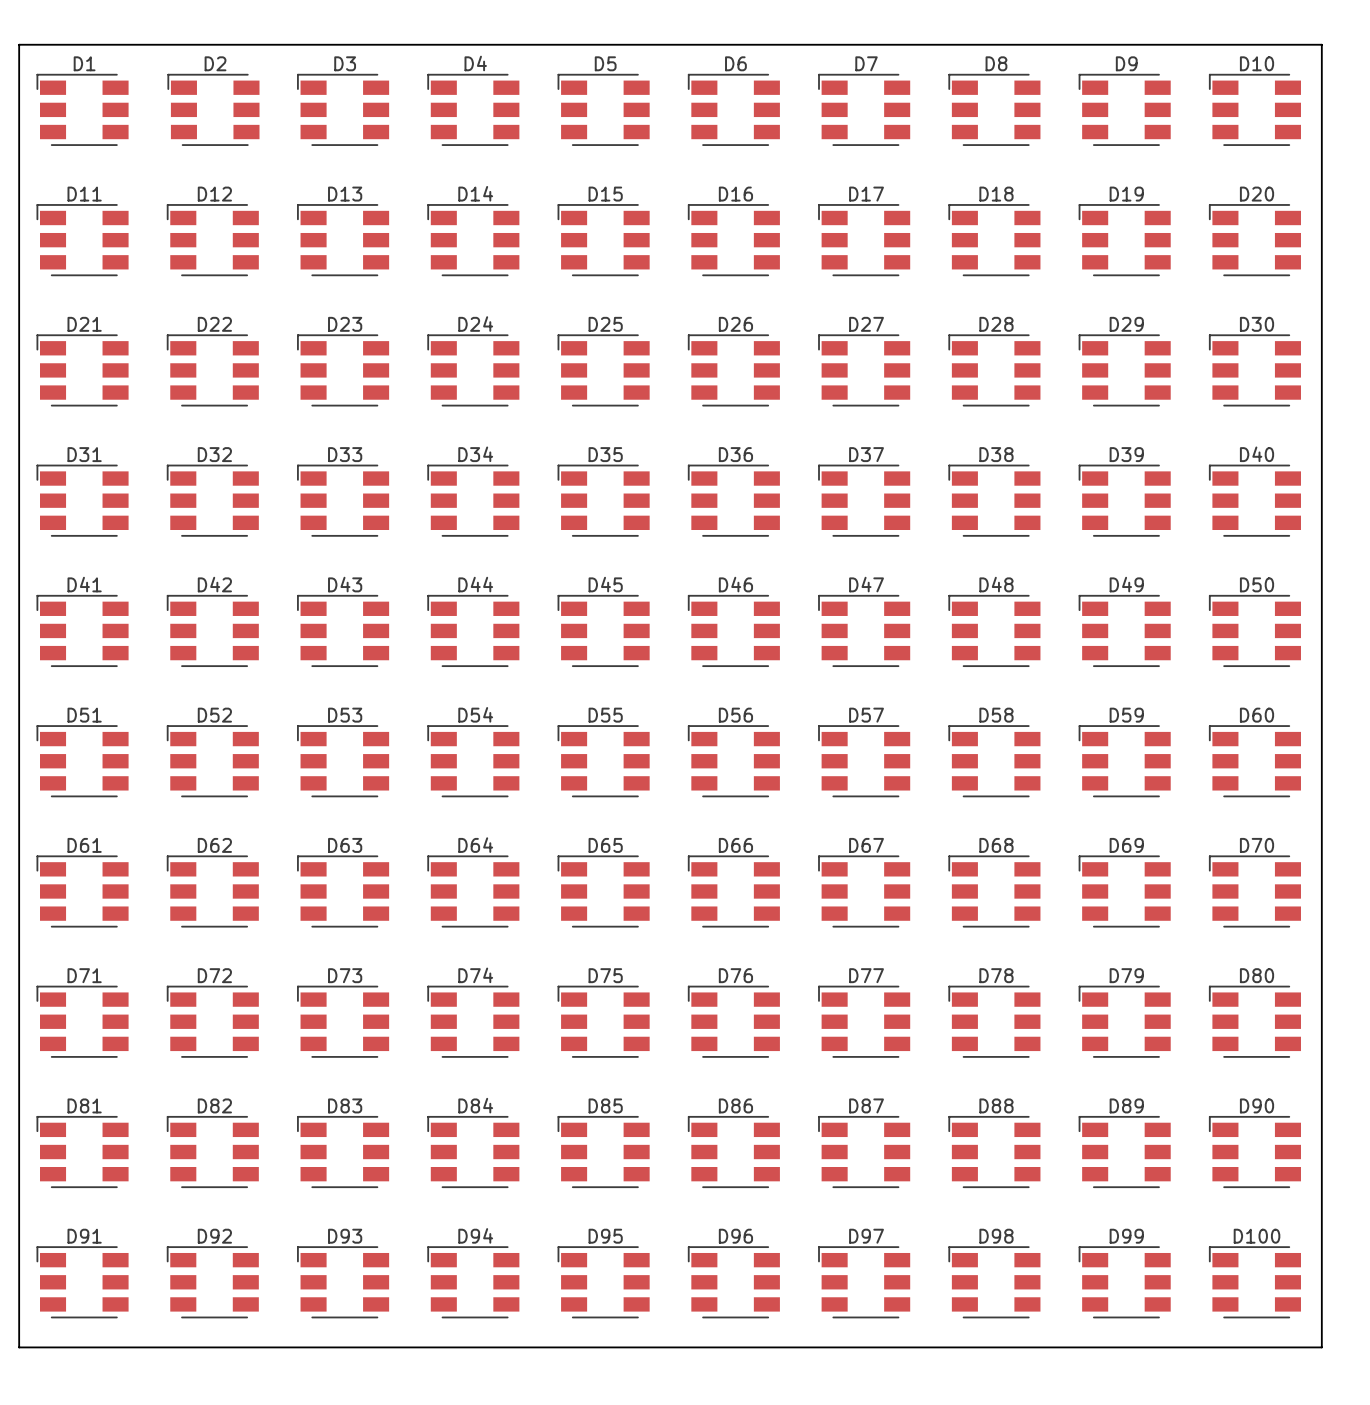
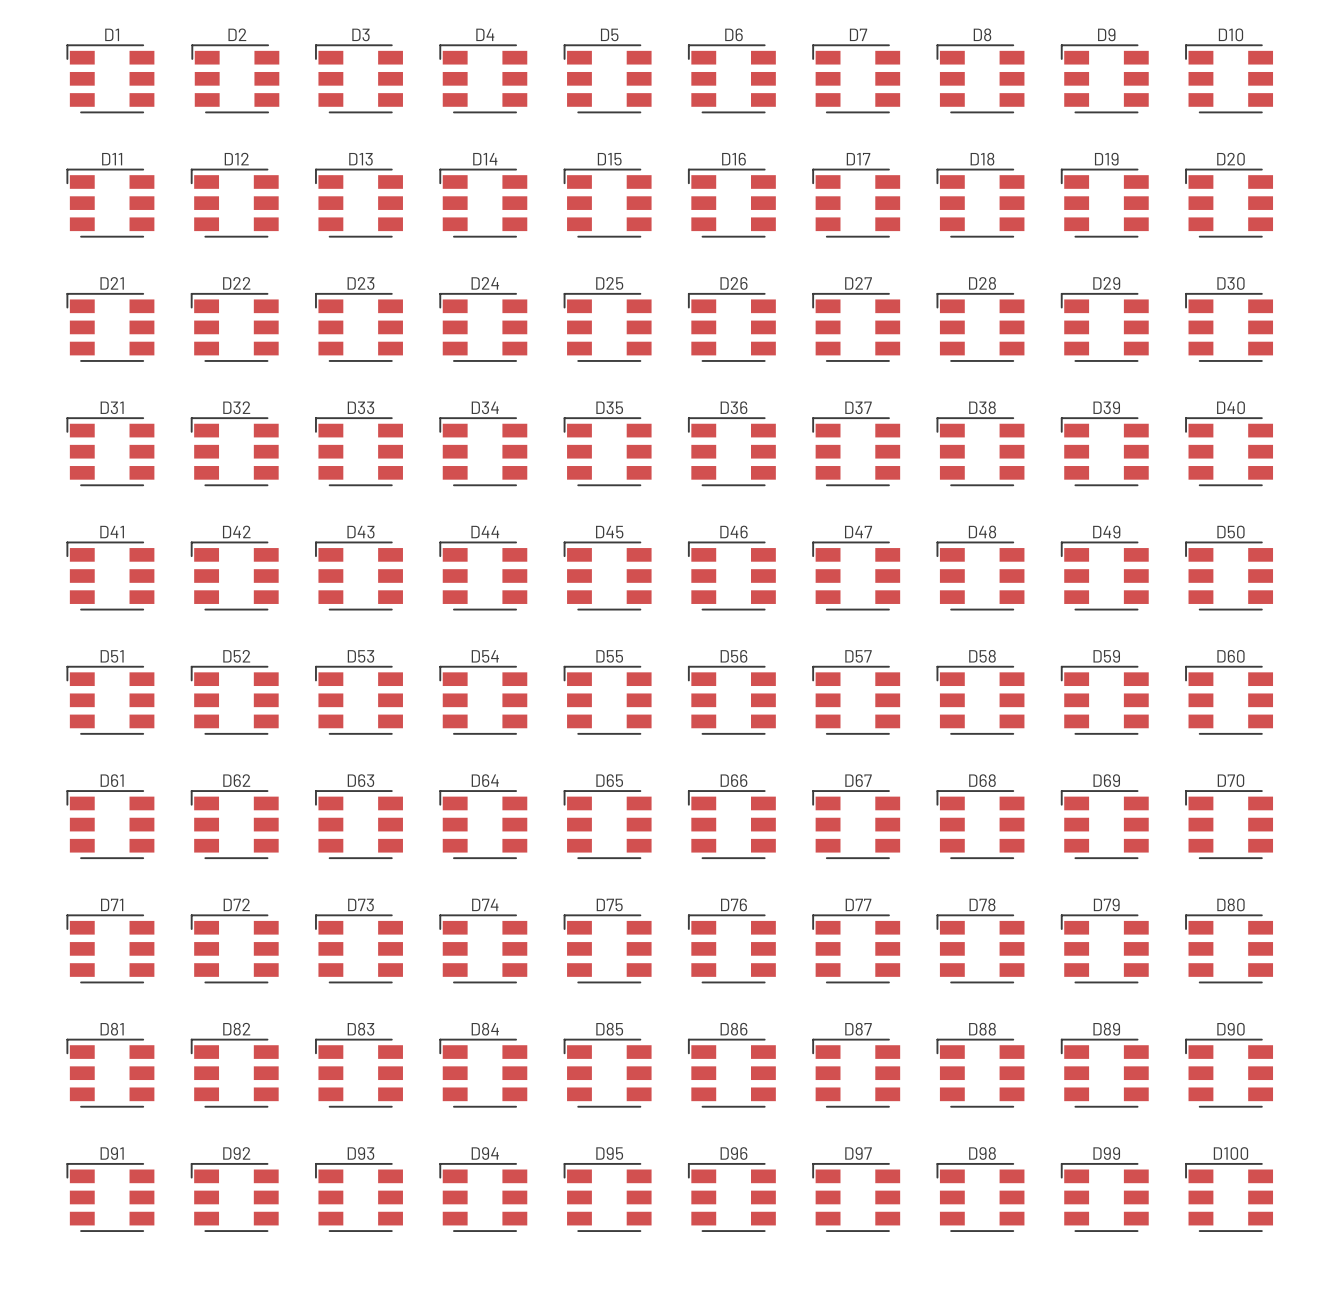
board edge: (19, 44) (1321, 44) (1321, 1347) (19, 1347) (19, 44) -> none

